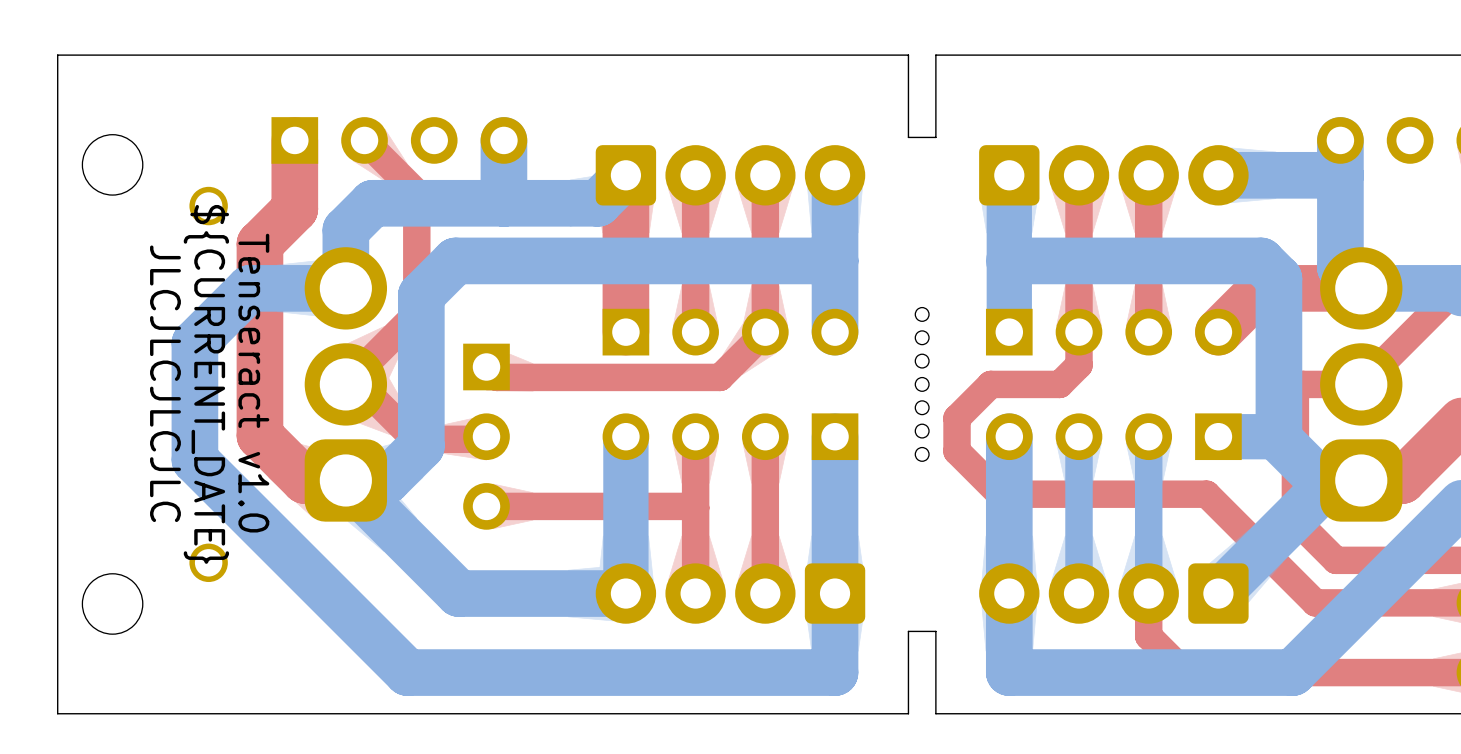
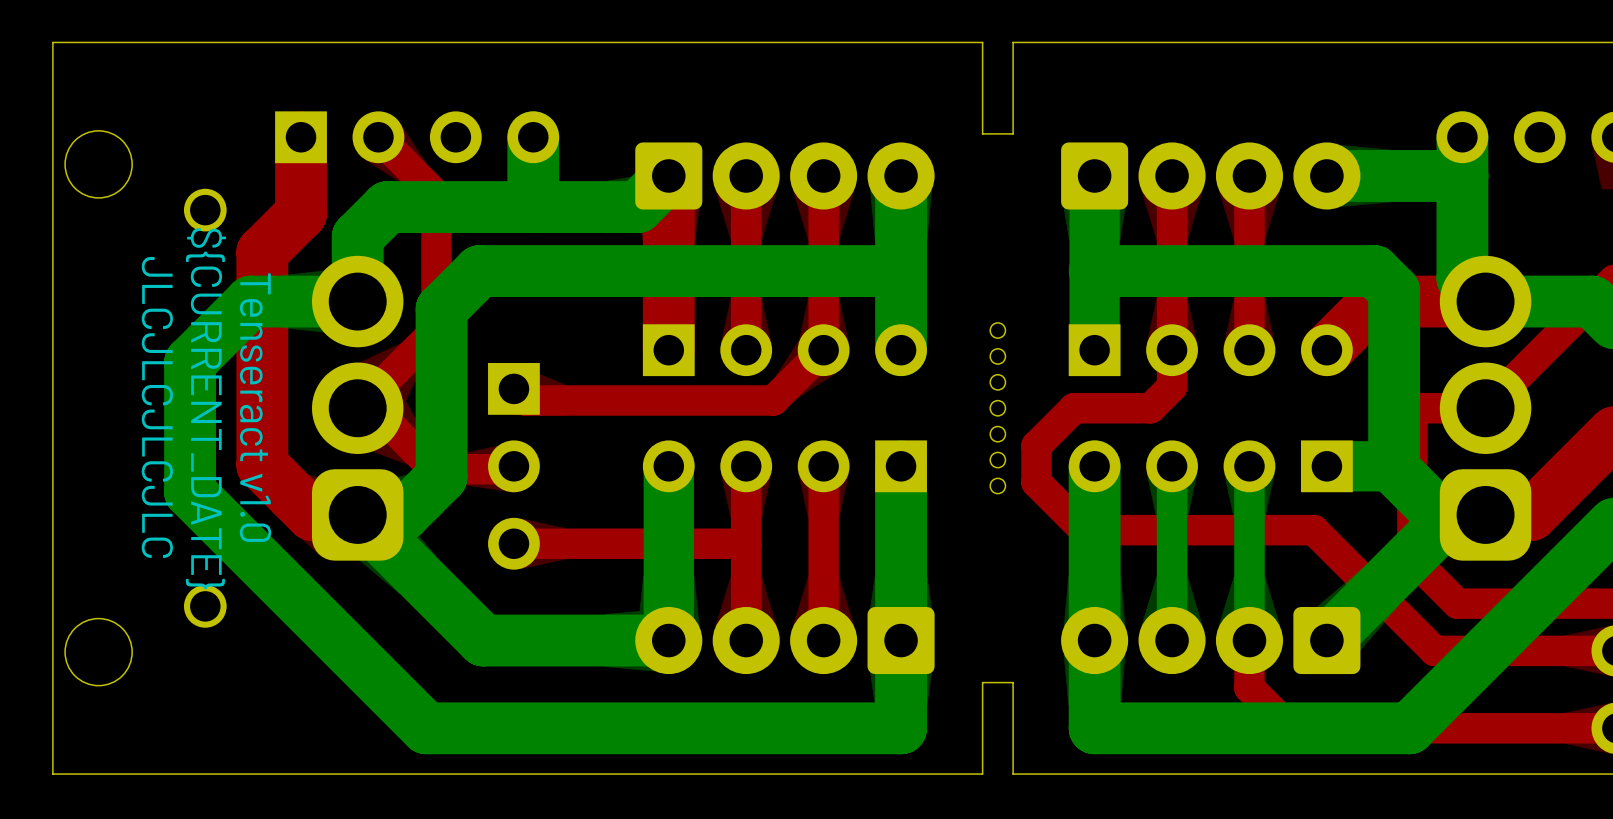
board edge: (71, 55) (57, 55) (57, 713) (71, 713) -> (52, 42) (52, 774)

